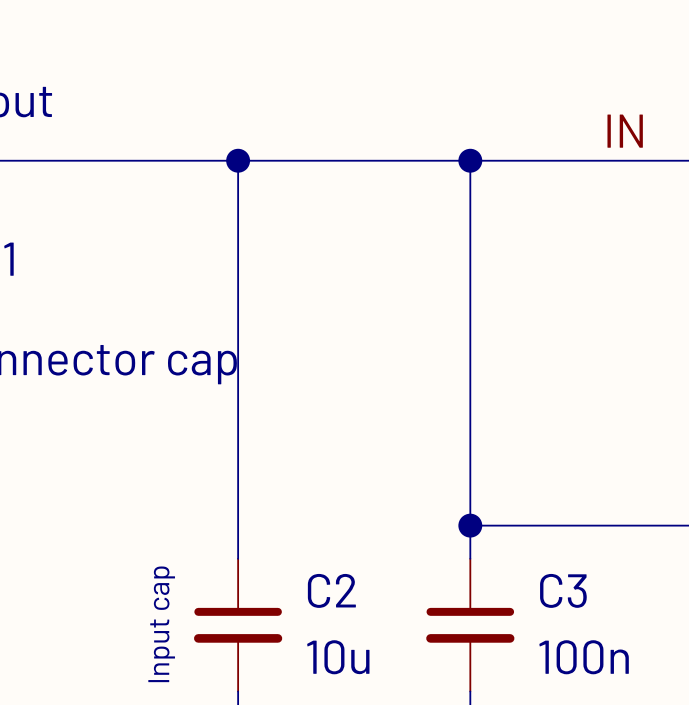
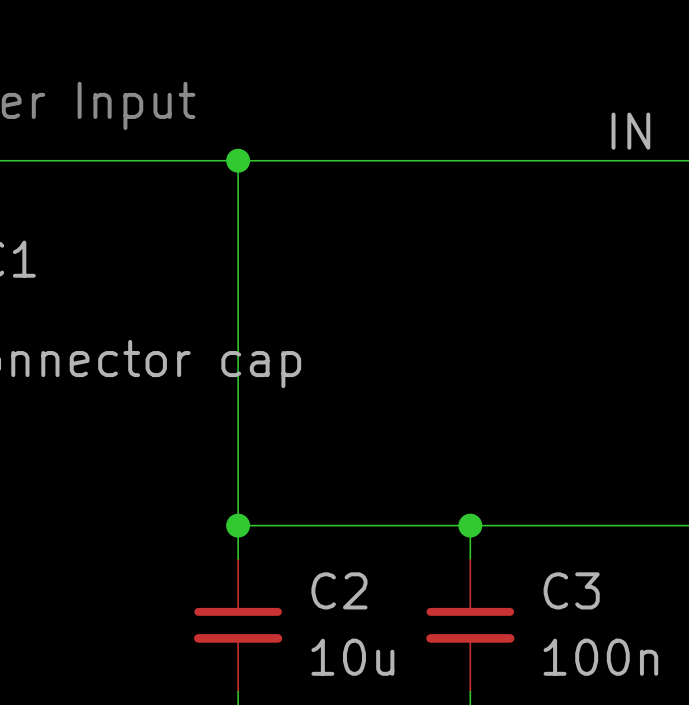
wire: (470, 160) (470, 525) -> (238, 525) (470, 525)
junction: (470, 160) -> none
junction: none -> (238, 525)
text: Input cap (161, 624) -> none

